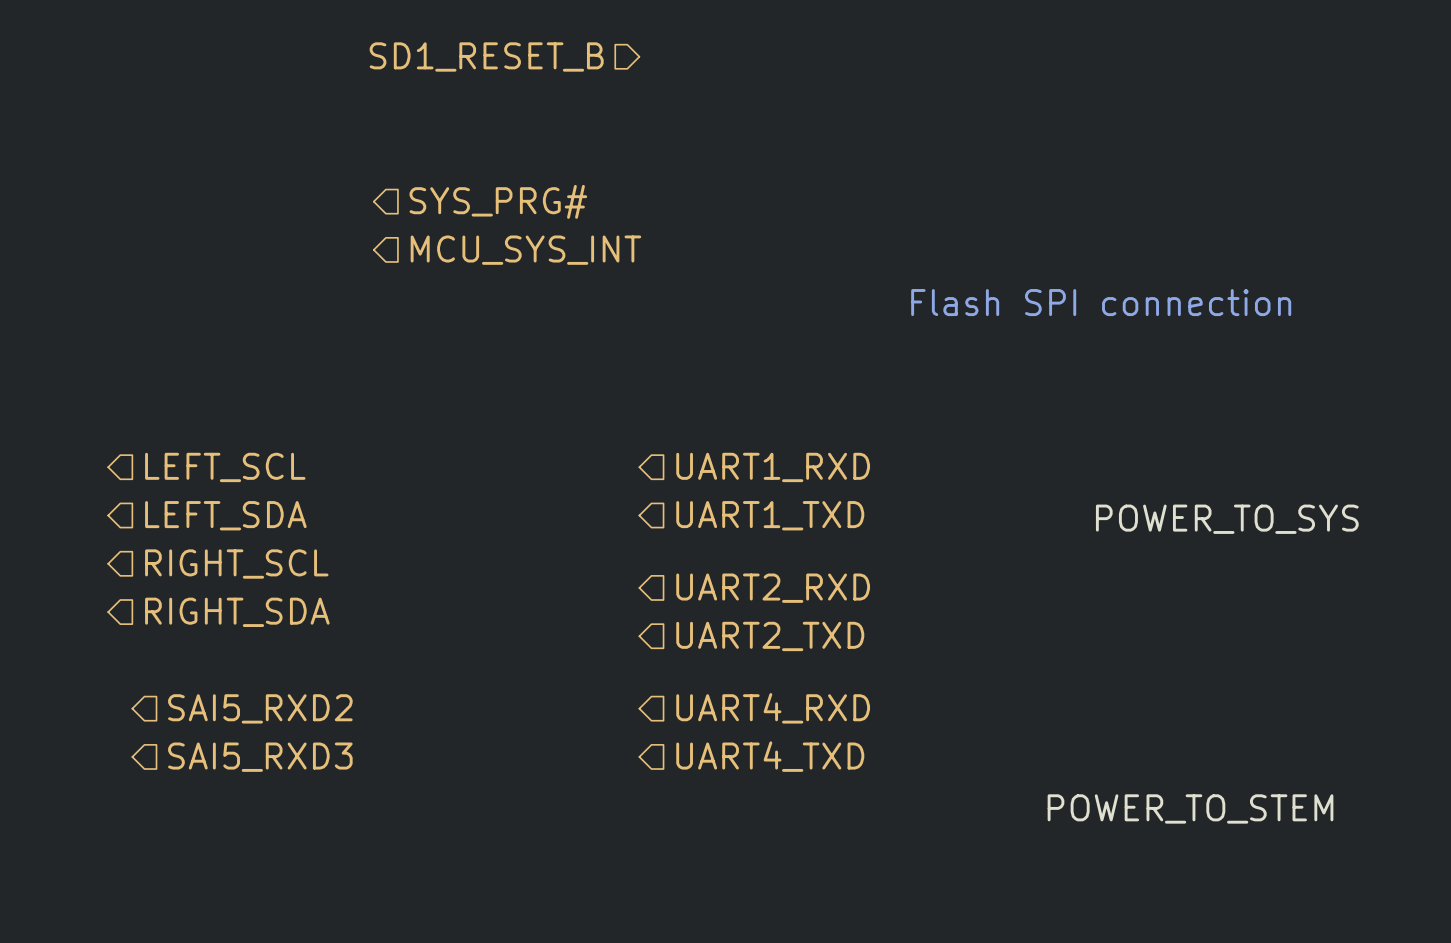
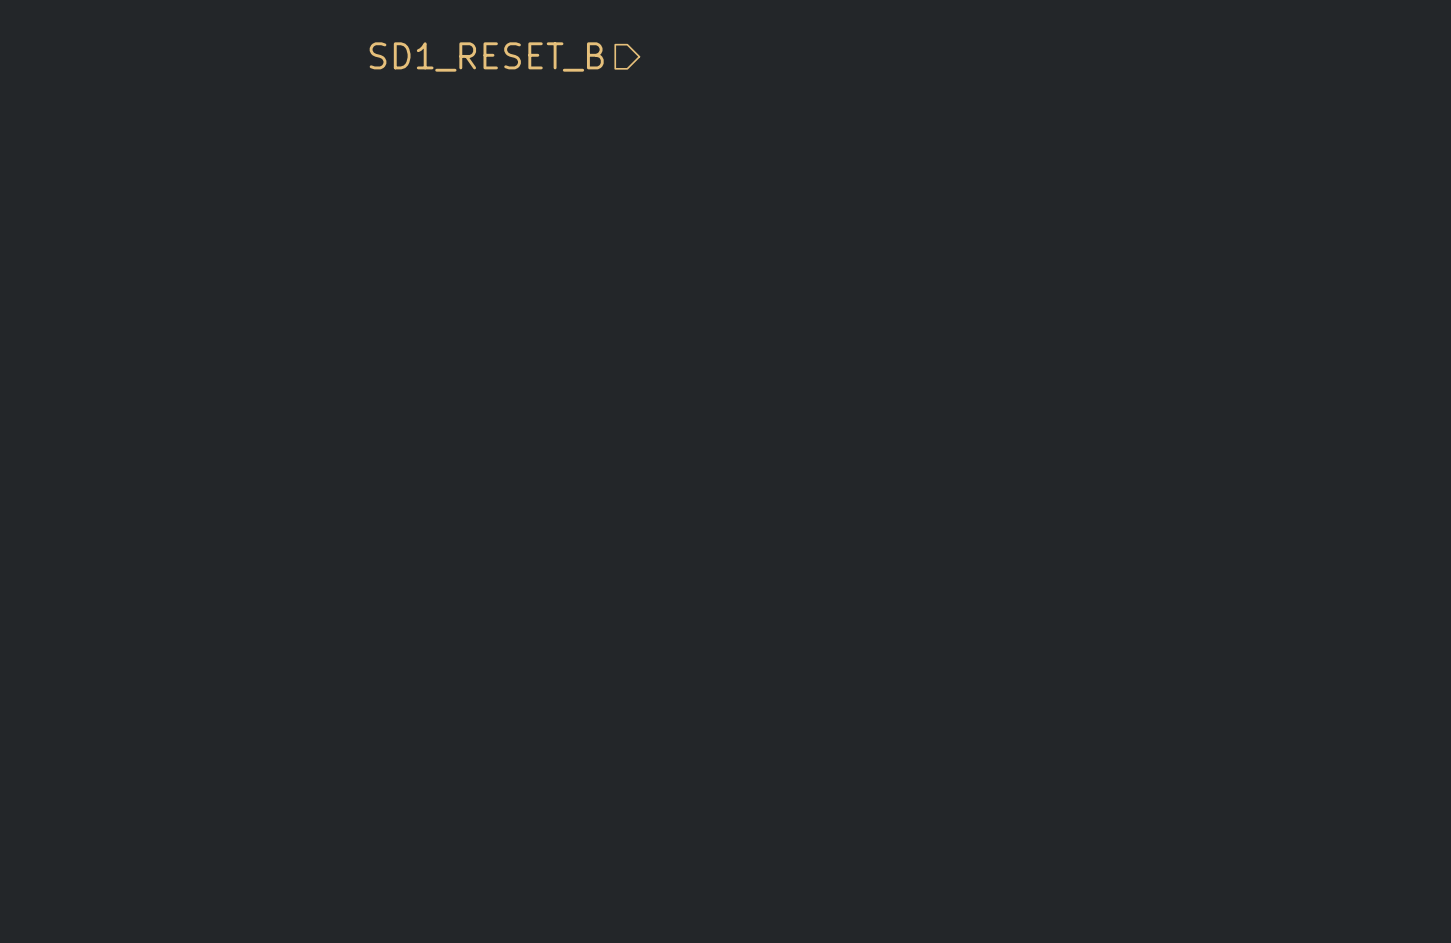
hierarchical label: SYS_PRG# (498, 201) -> none
hierarchical label: MCU_SYS_INT (525, 250) -> none
text: Flash SPI connection (1101, 302) -> none
hierarchical label: LEFT_SCL (225, 467) -> none
hierarchical label: UART1_RXD (773, 467) -> none
hierarchical label: LEFT_SDA (225, 515) -> none
hierarchical label: UART1_TXD (770, 515) -> none
label: POWER_TO_SYS (1227, 519) -> none
hierarchical label: RIGHT_SCL (236, 564) -> none
hierarchical label: UART2_RXD (773, 588) -> none
hierarchical label: RIGHT_SDA (237, 612) -> none
hierarchical label: UART2_TXD (770, 636) -> none
hierarchical label: SAI5_RXD2 (260, 708) -> none
hierarchical label: UART4_RXD (773, 708) -> none
hierarchical label: UART4_TXD (770, 756) -> none
hierarchical label: SAI5_RXD3 (260, 757) -> none
label: POWER_TO_STEM (1190, 808) -> none

